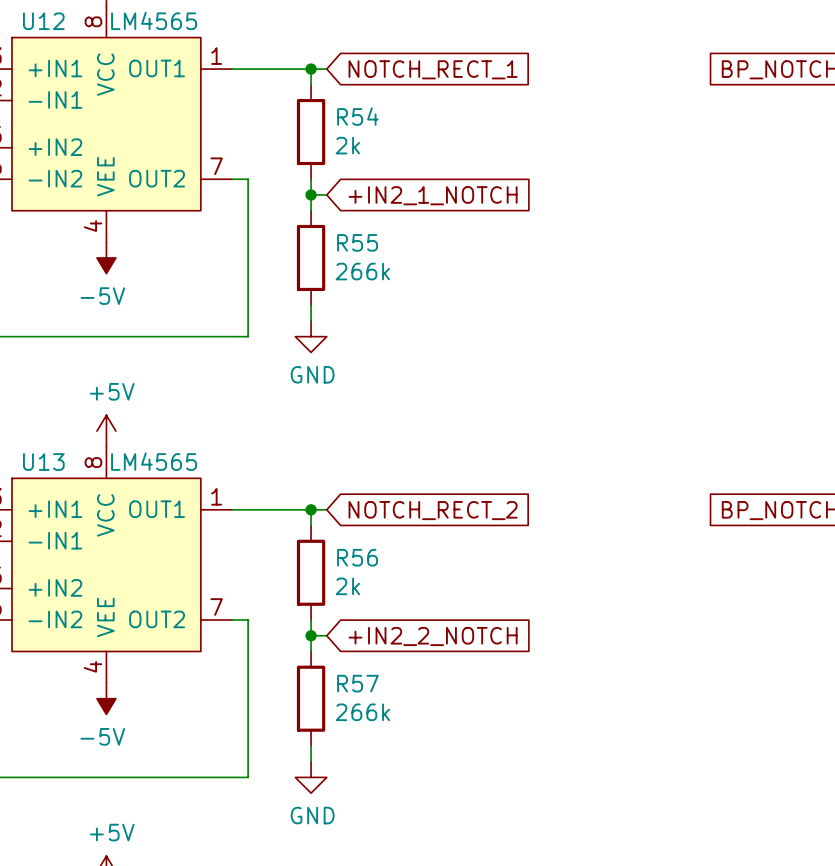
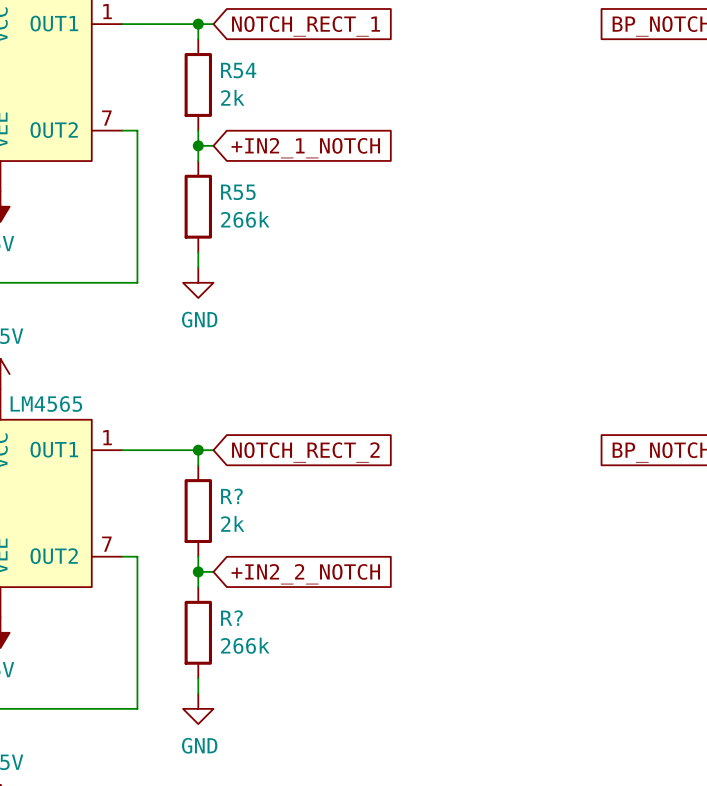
R56 name: R56 (357, 557) -> R? (231, 496)
R57 name: R57 (357, 683) -> R? (231, 618)

